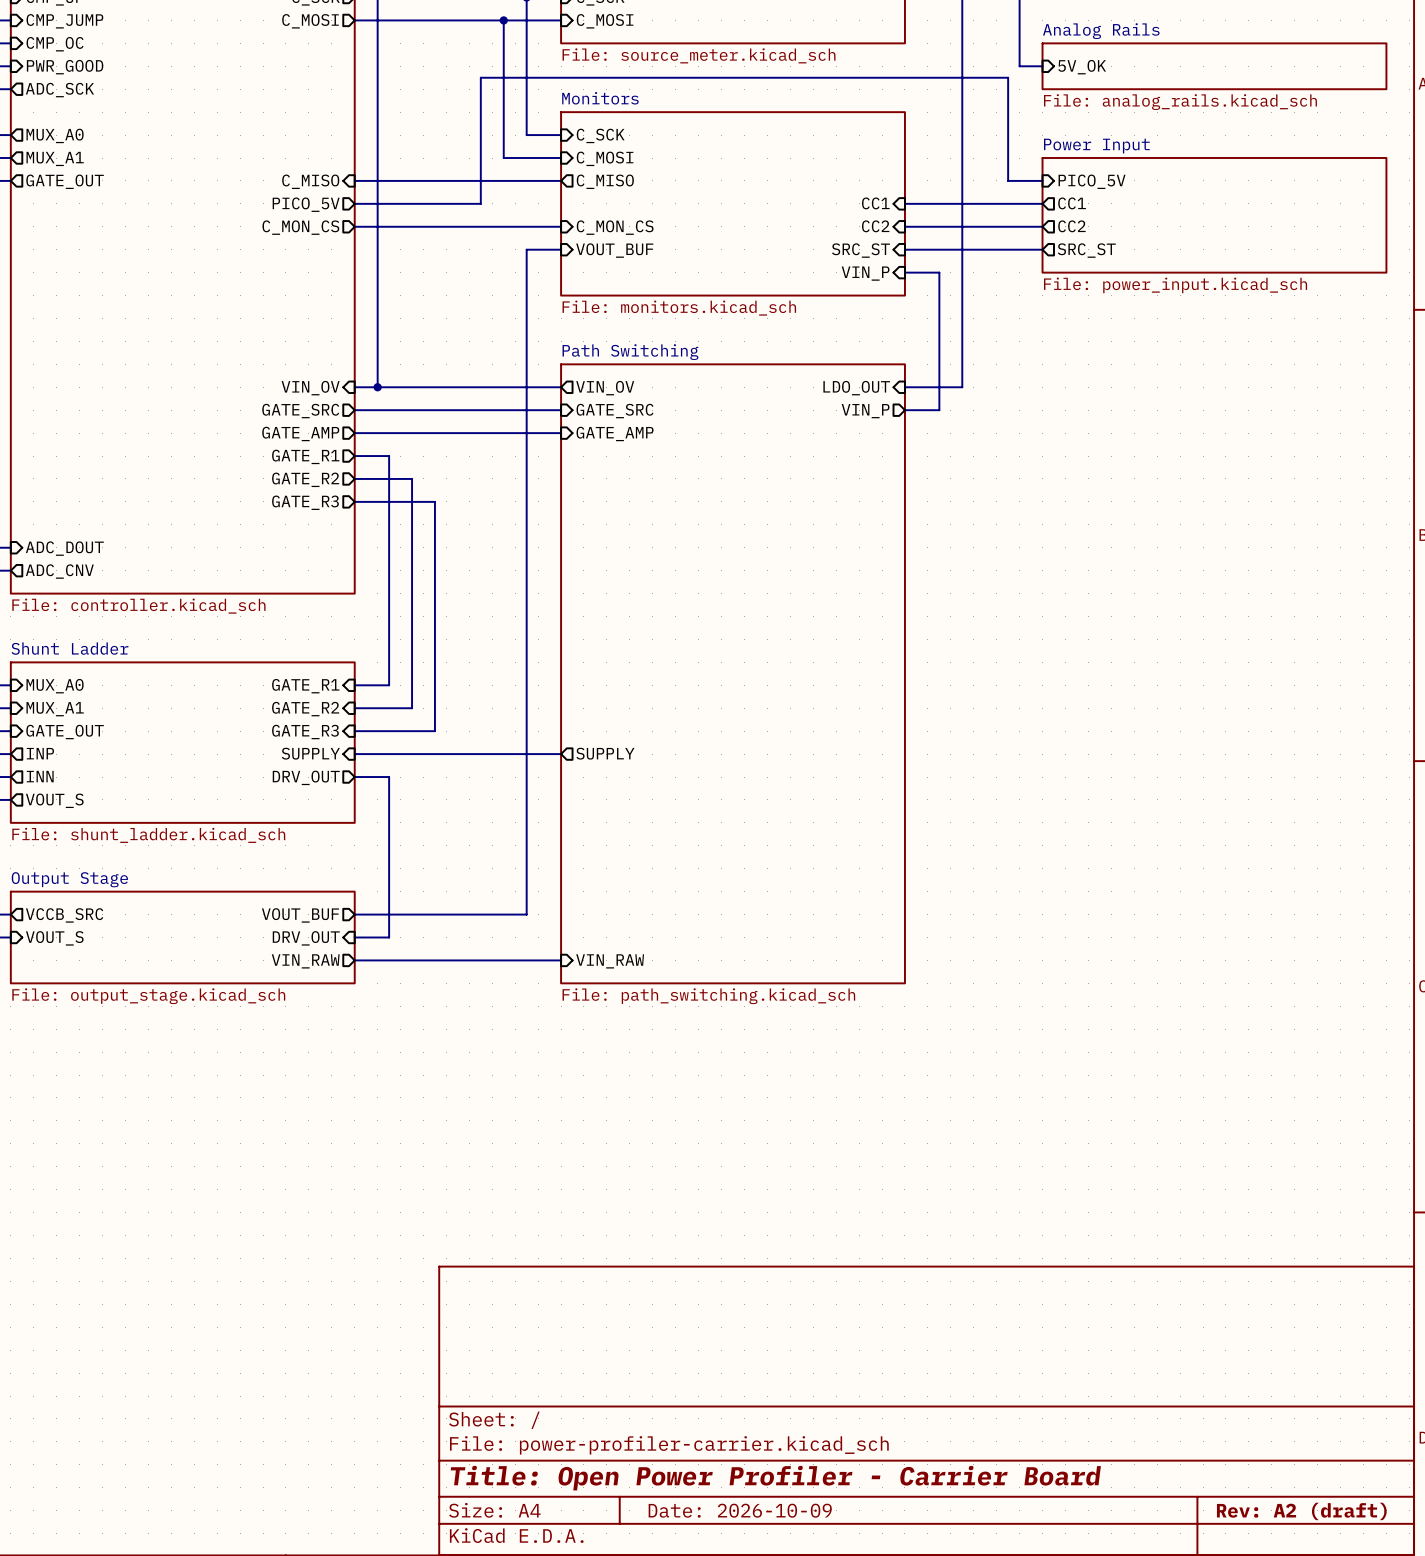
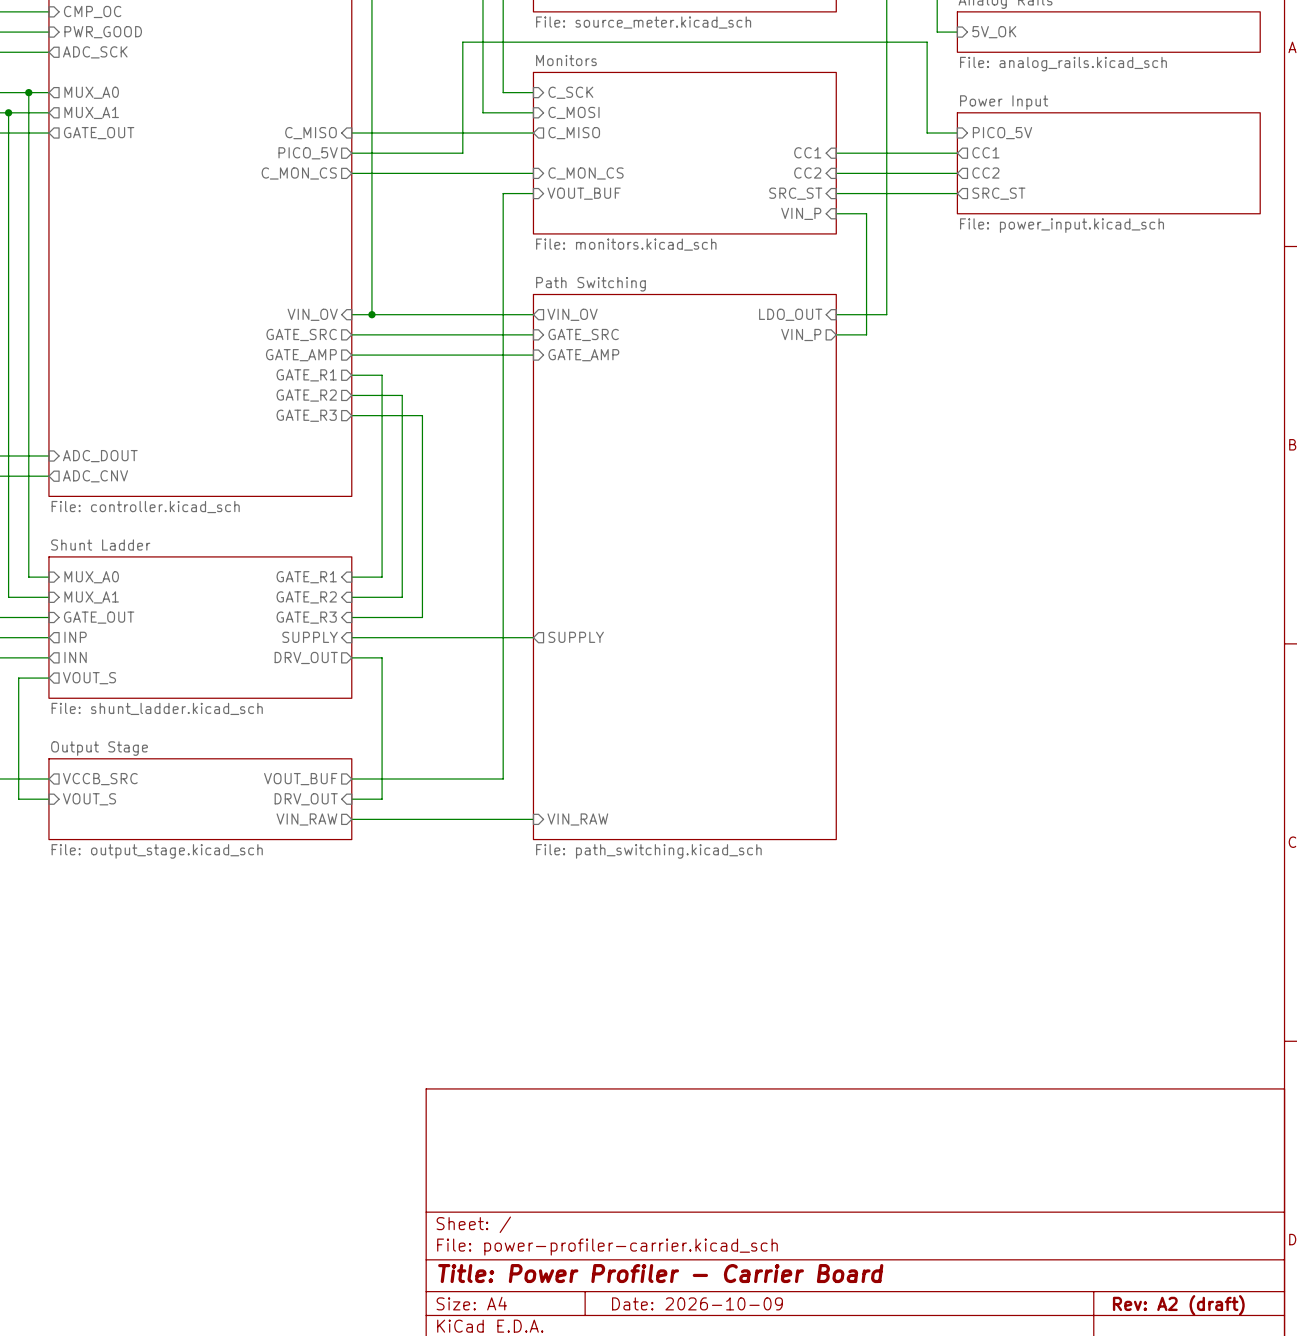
title block: Title: Open Power Profiler - Carrier Board (775, 1478) -> Title: Power Profiler - Carrier Board (660, 1273)

